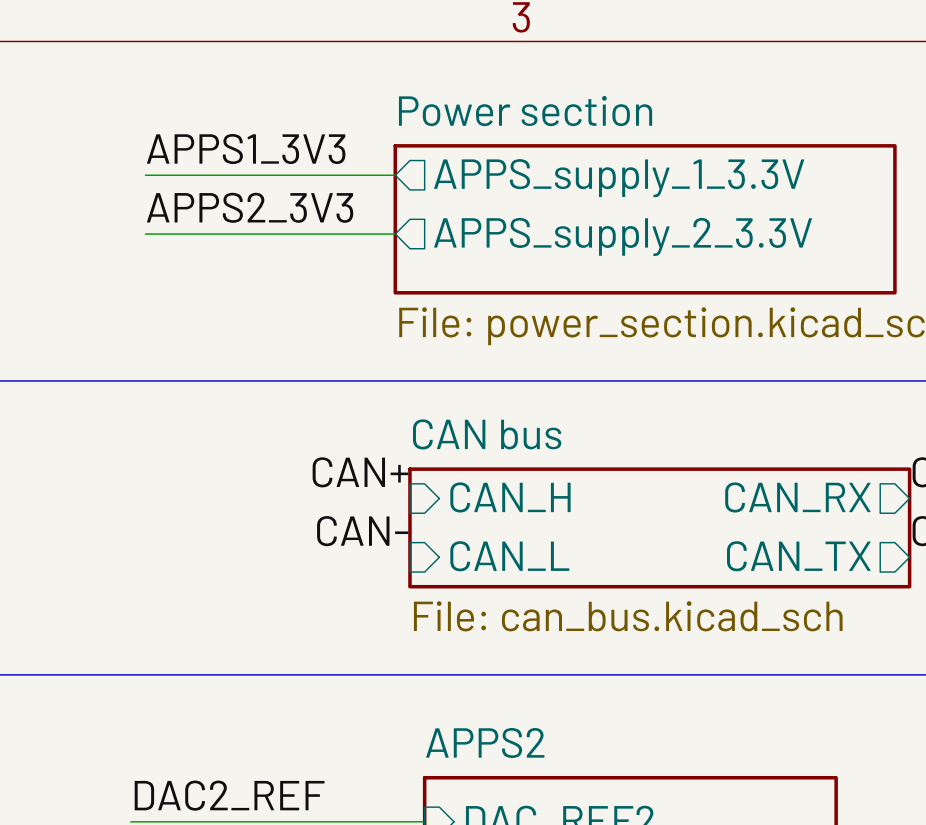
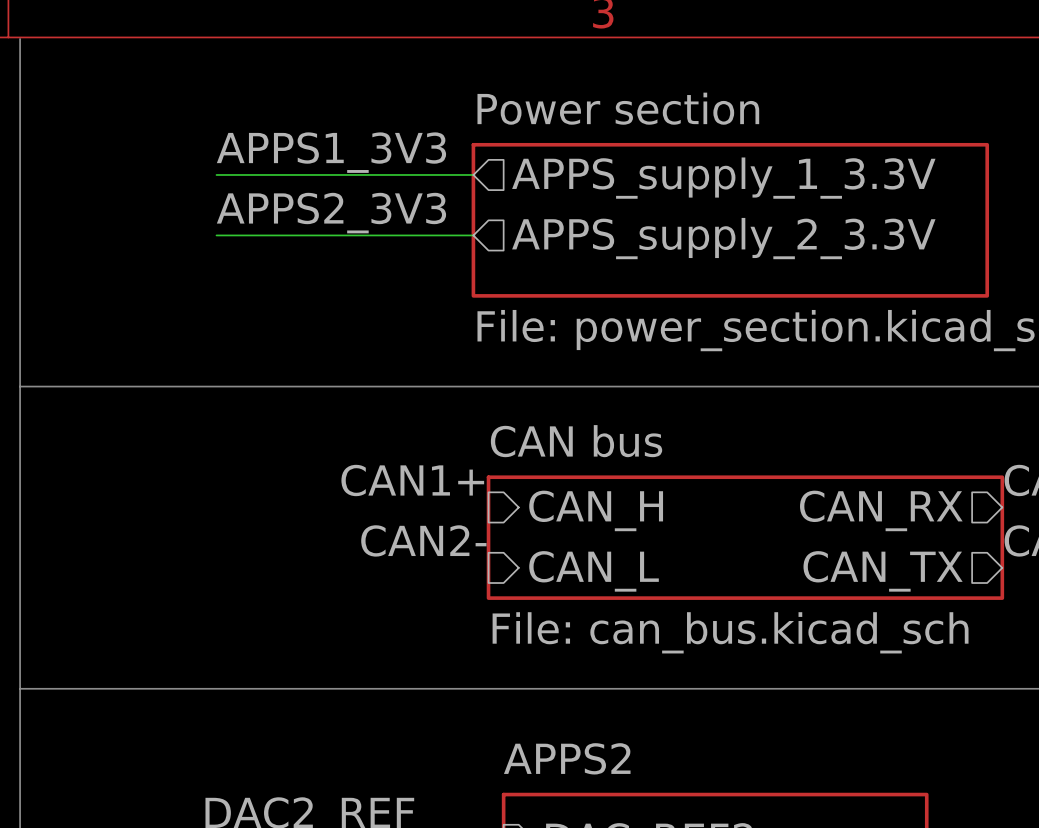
label: CAN+ (360, 472) -> CAN1+ (412, 480)
label: CAN- (362, 531) -> CAN2- (423, 540)

